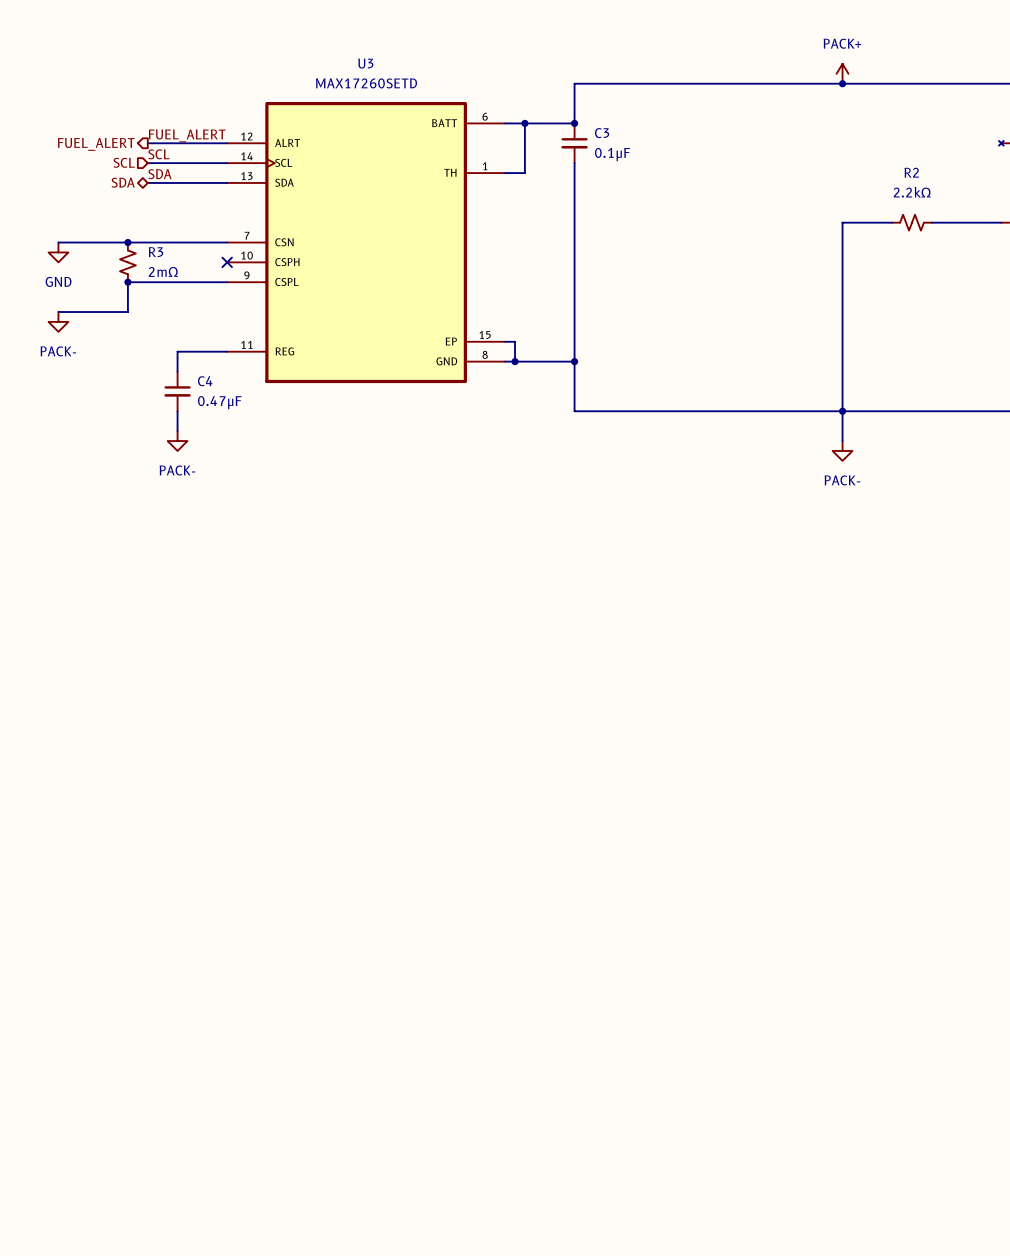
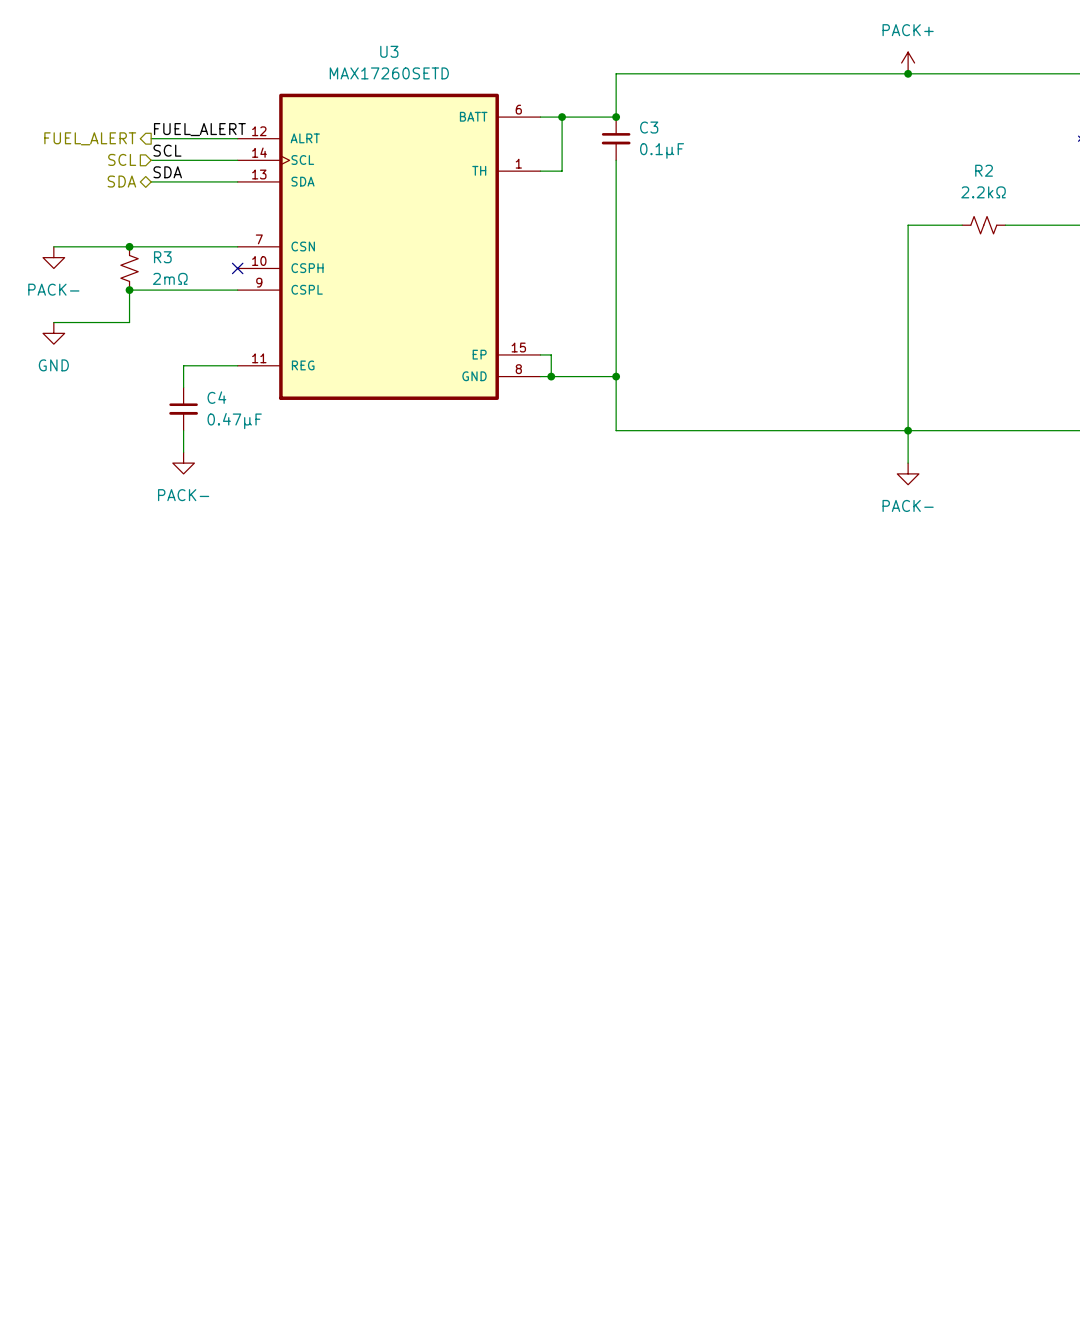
power symbol: GND (58, 252) -> PACK- (53, 257)
power symbol: PACK- (58, 321) -> GND (53, 333)

